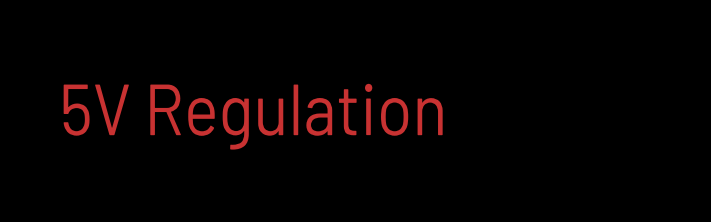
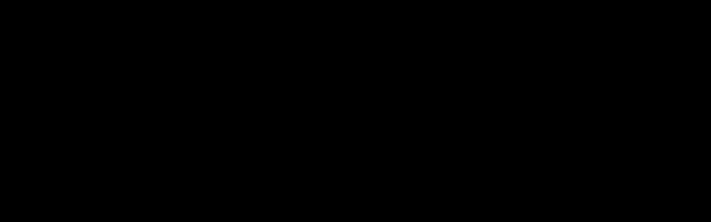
text: 5V Regulation (253, 116) -> none

